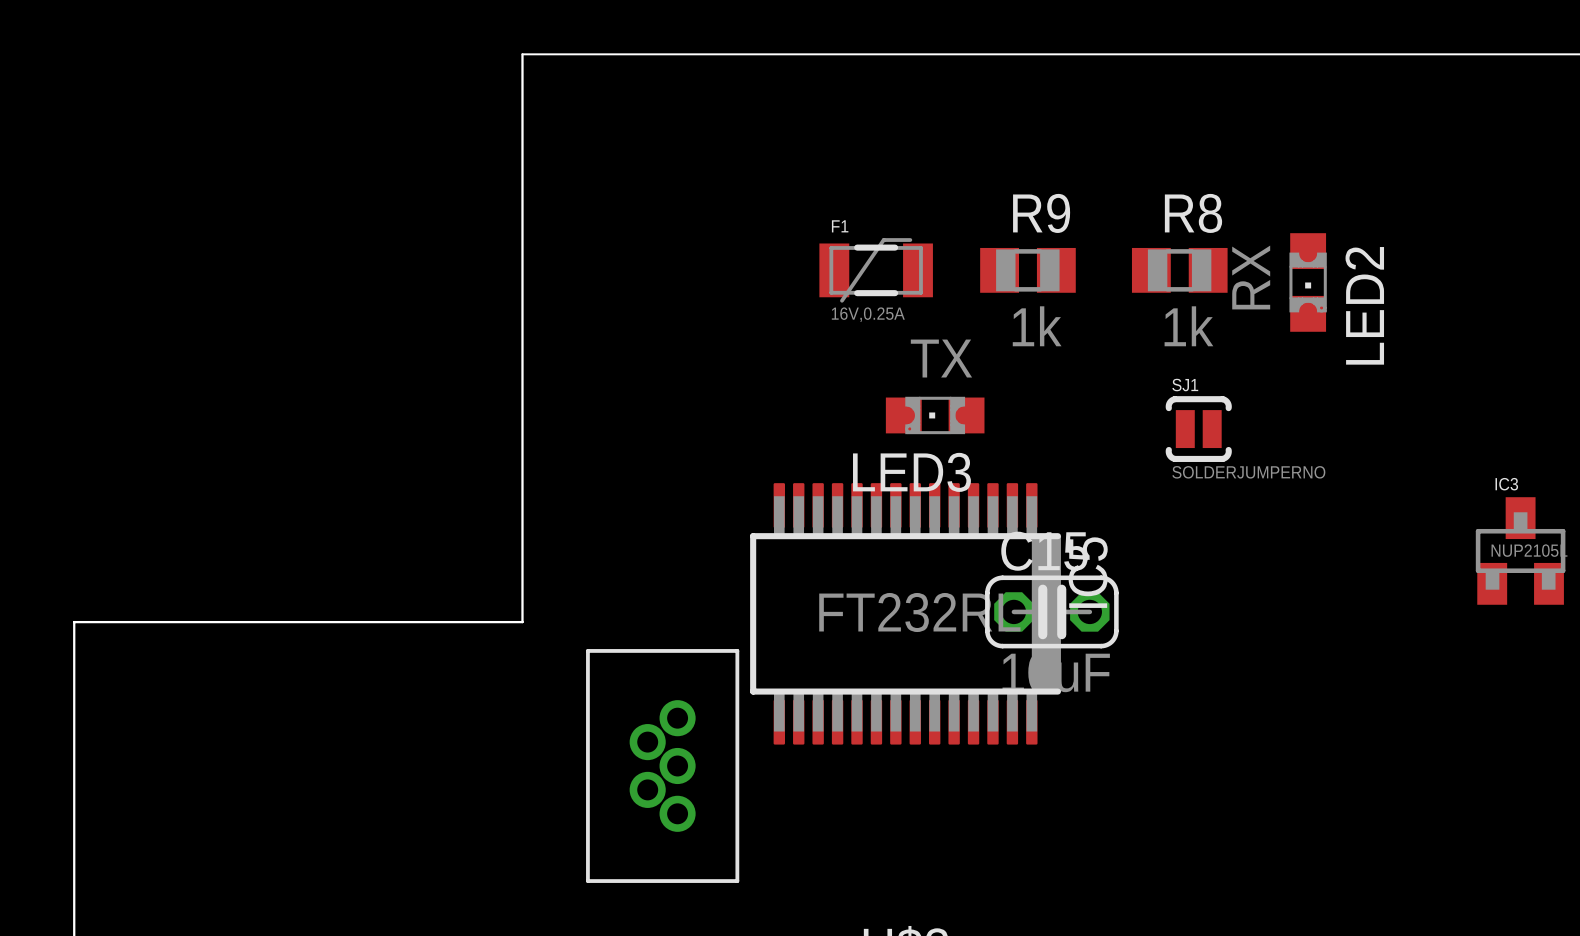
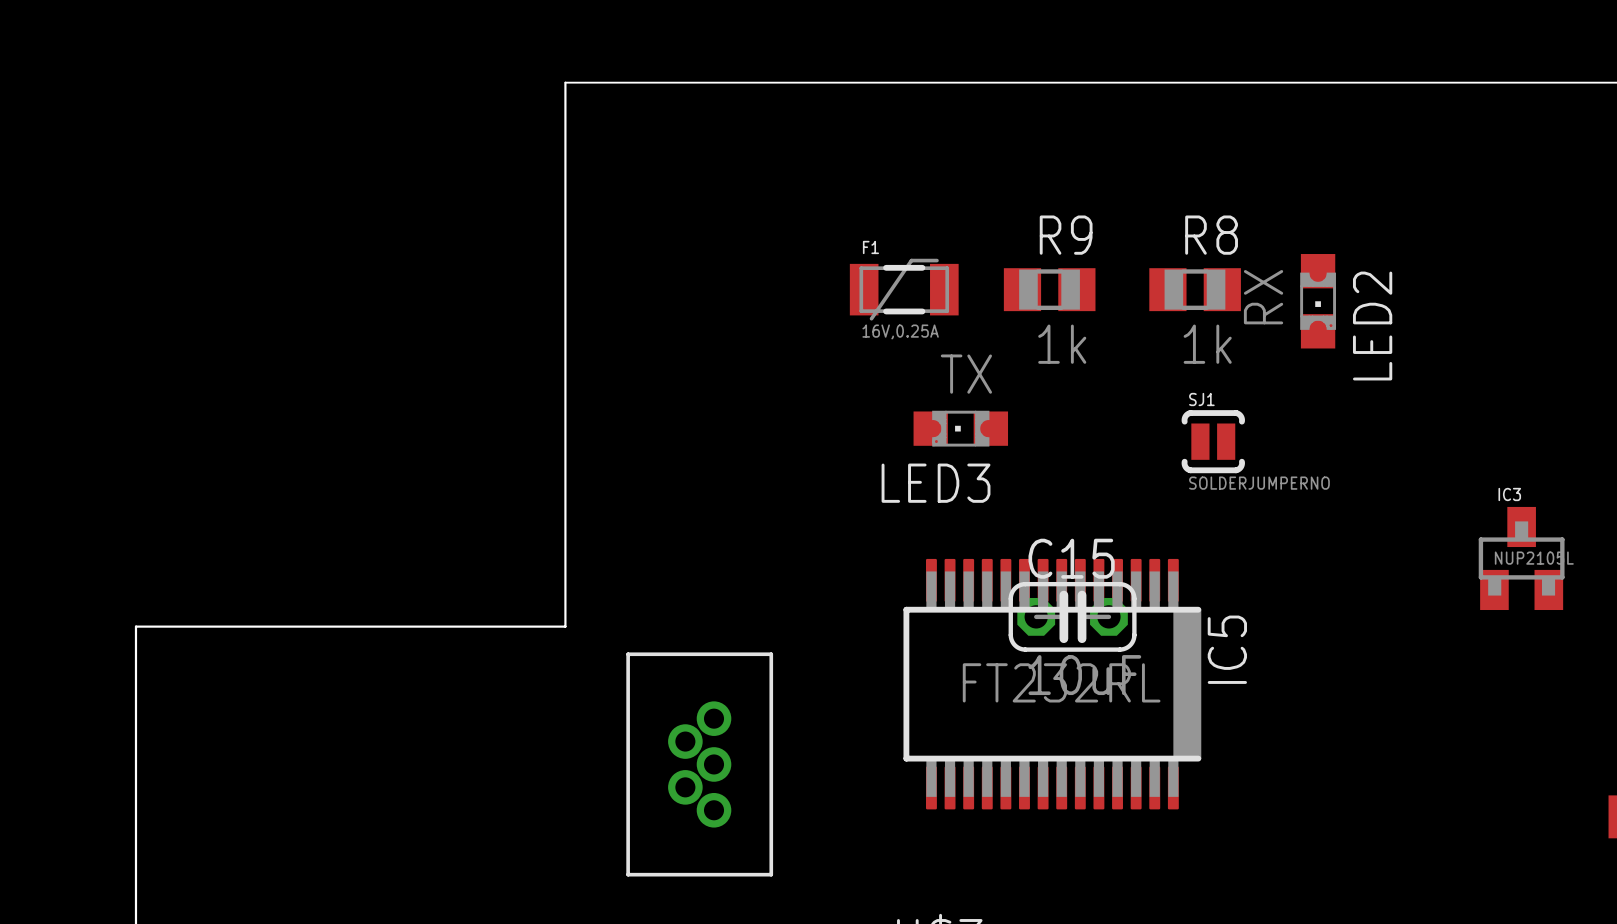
IC5 position: (905, 613) -> (1052, 684)

